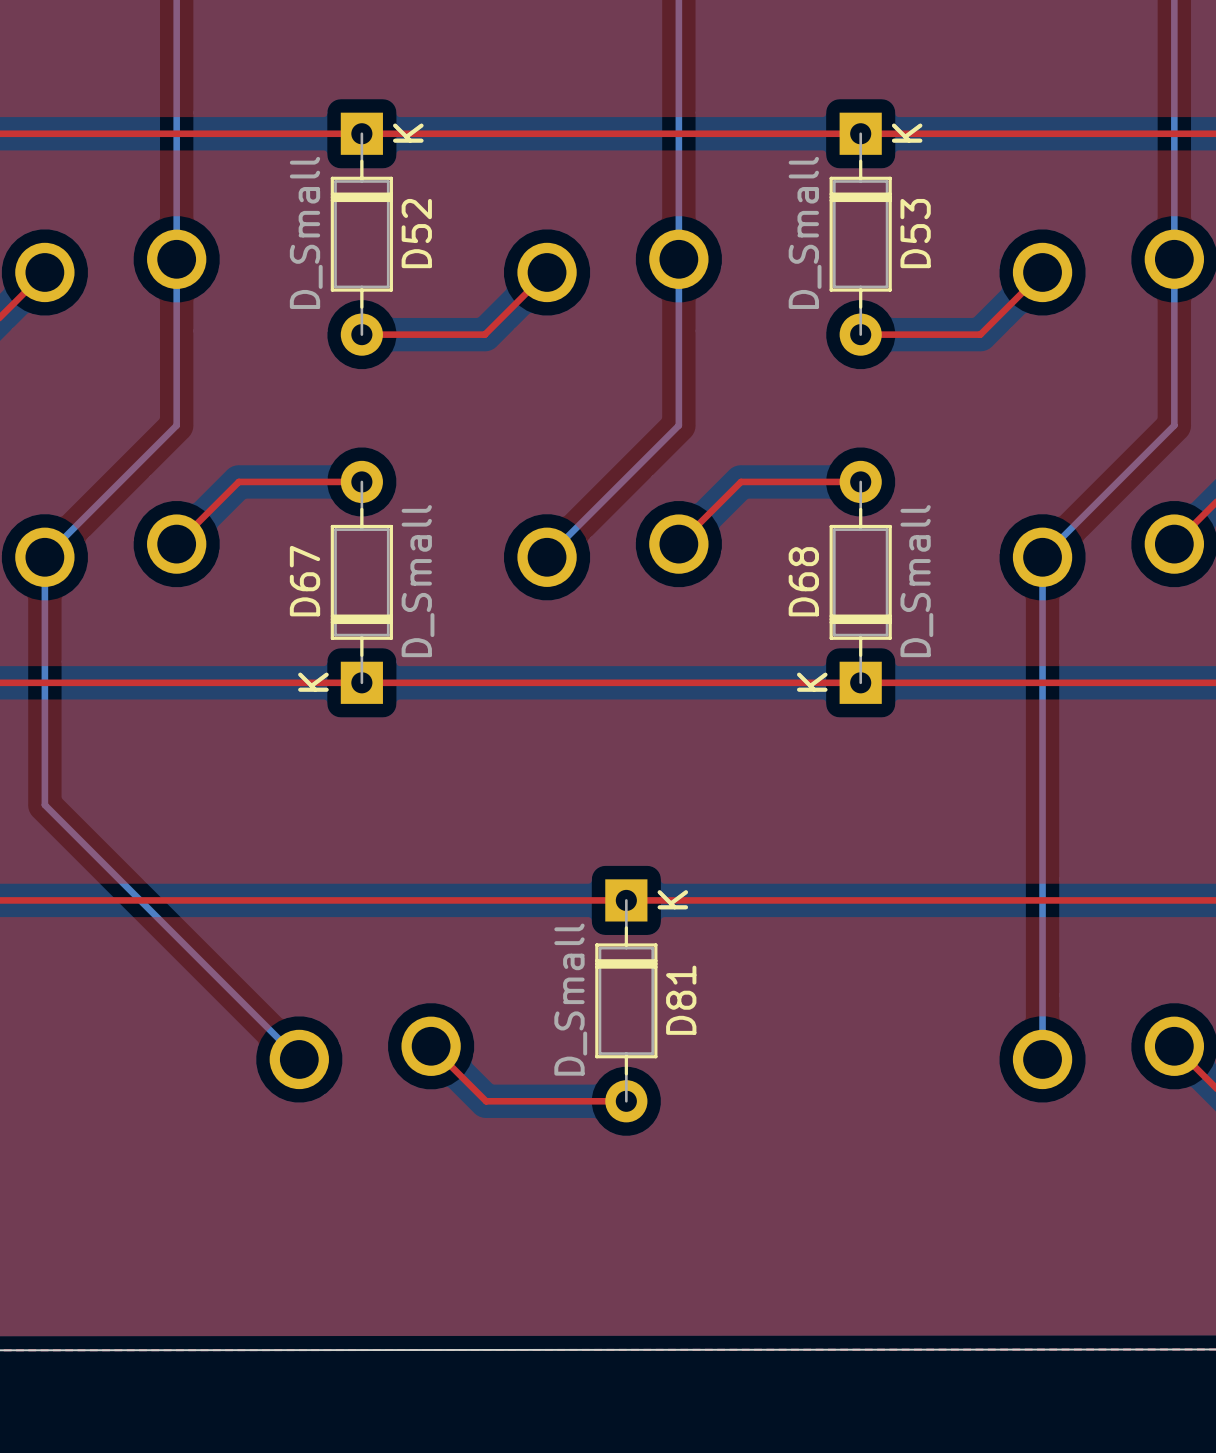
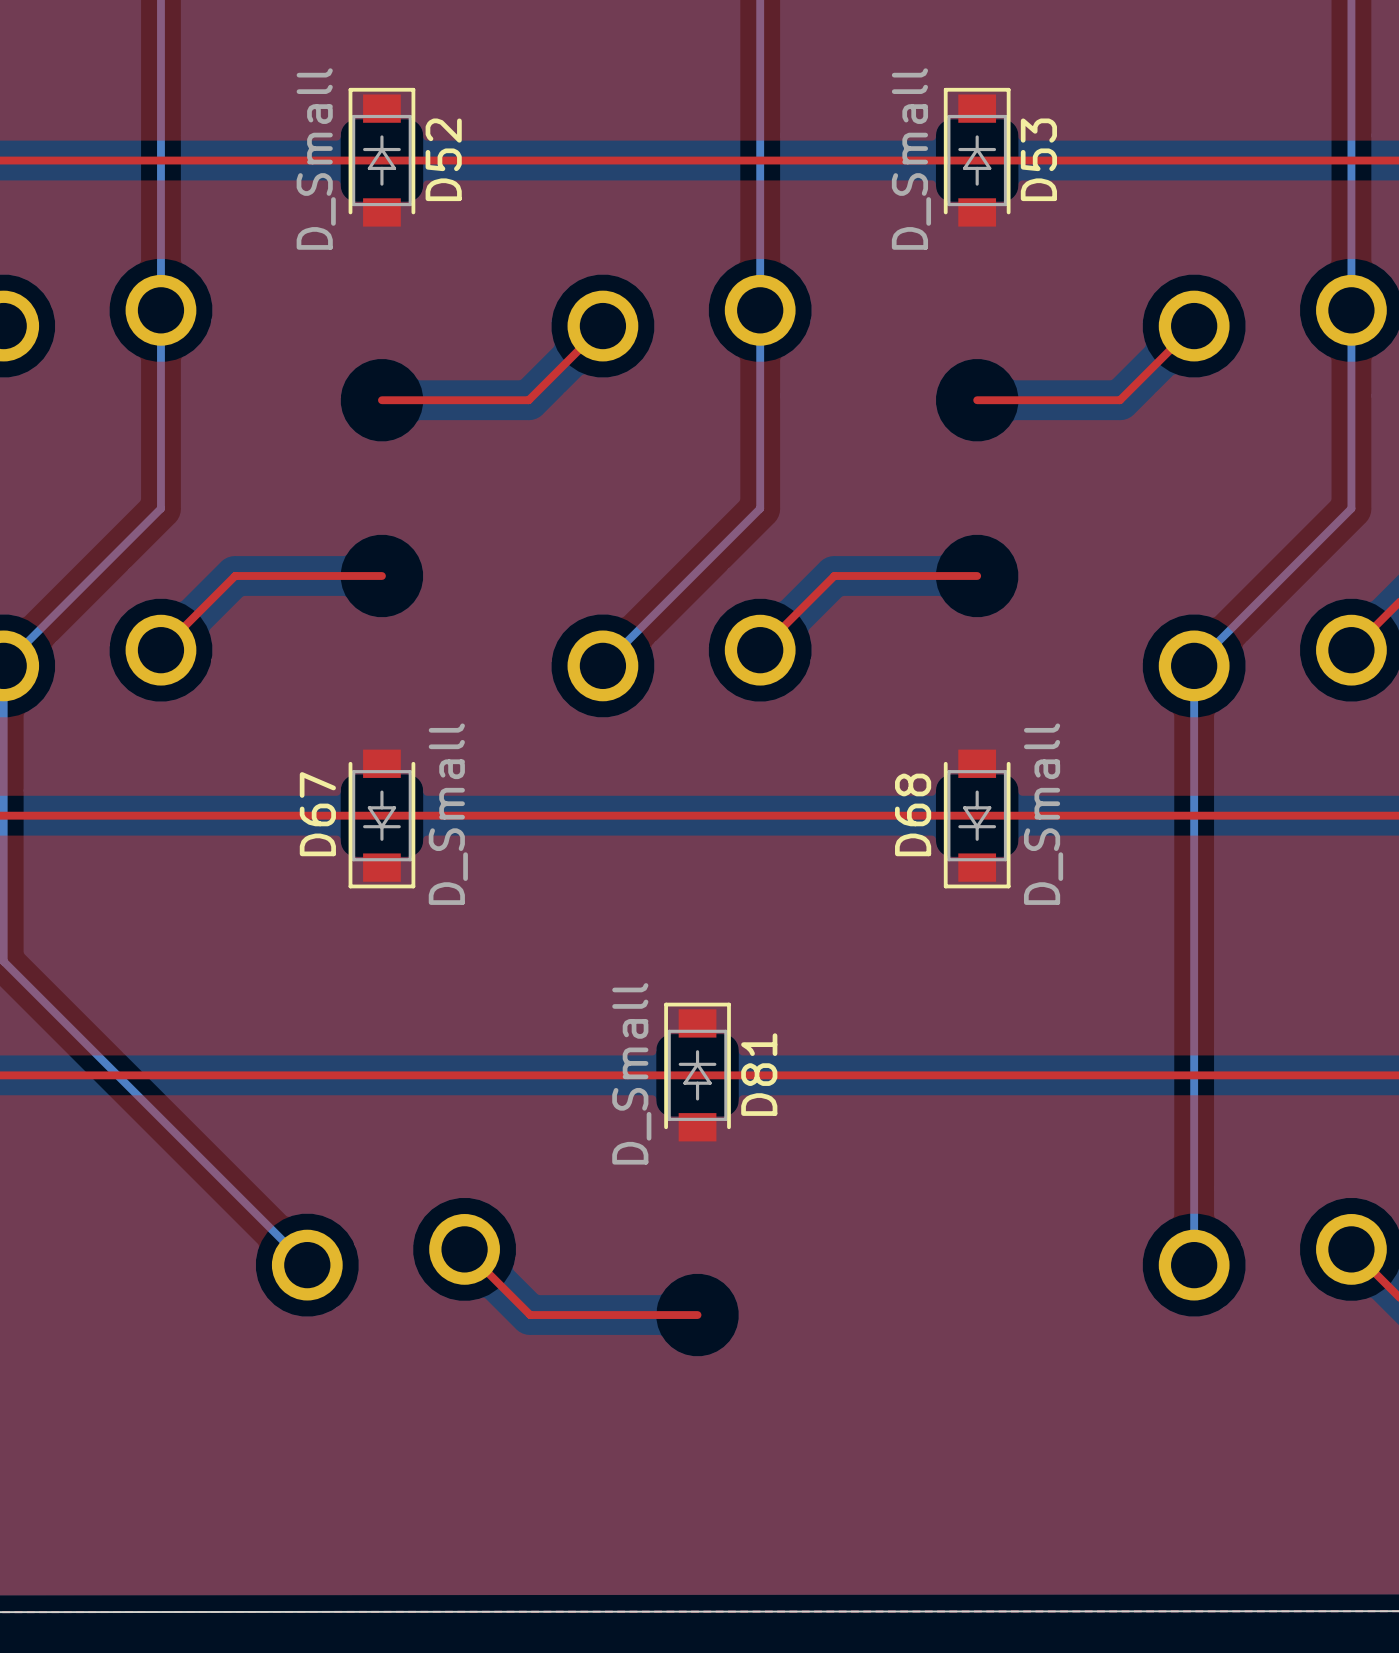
D52 footprint: [330, 112, 393, 356] -> [348, 87, 416, 227]
D53 footprint: [829, 112, 892, 356] -> [943, 87, 1011, 227]
D67 footprint: [330, 460, 393, 704] -> [348, 749, 416, 889]
D68 footprint: [829, 460, 892, 704] -> [943, 749, 1011, 889]
D81 footprint: [595, 879, 658, 1123] -> [664, 1002, 731, 1142]

